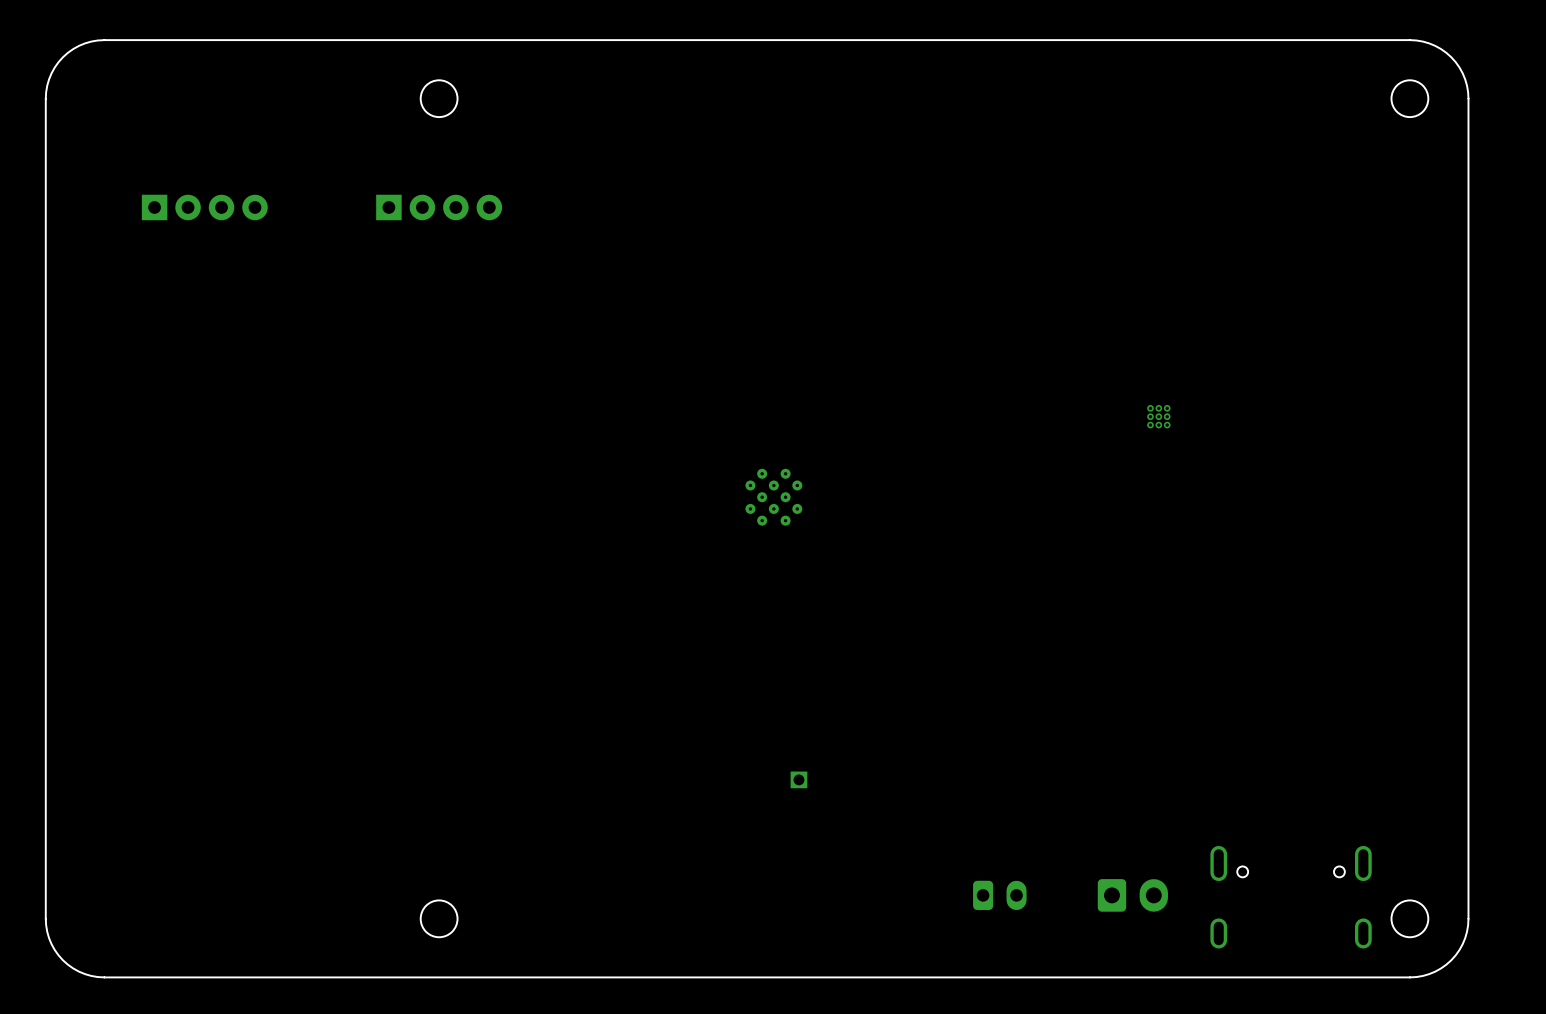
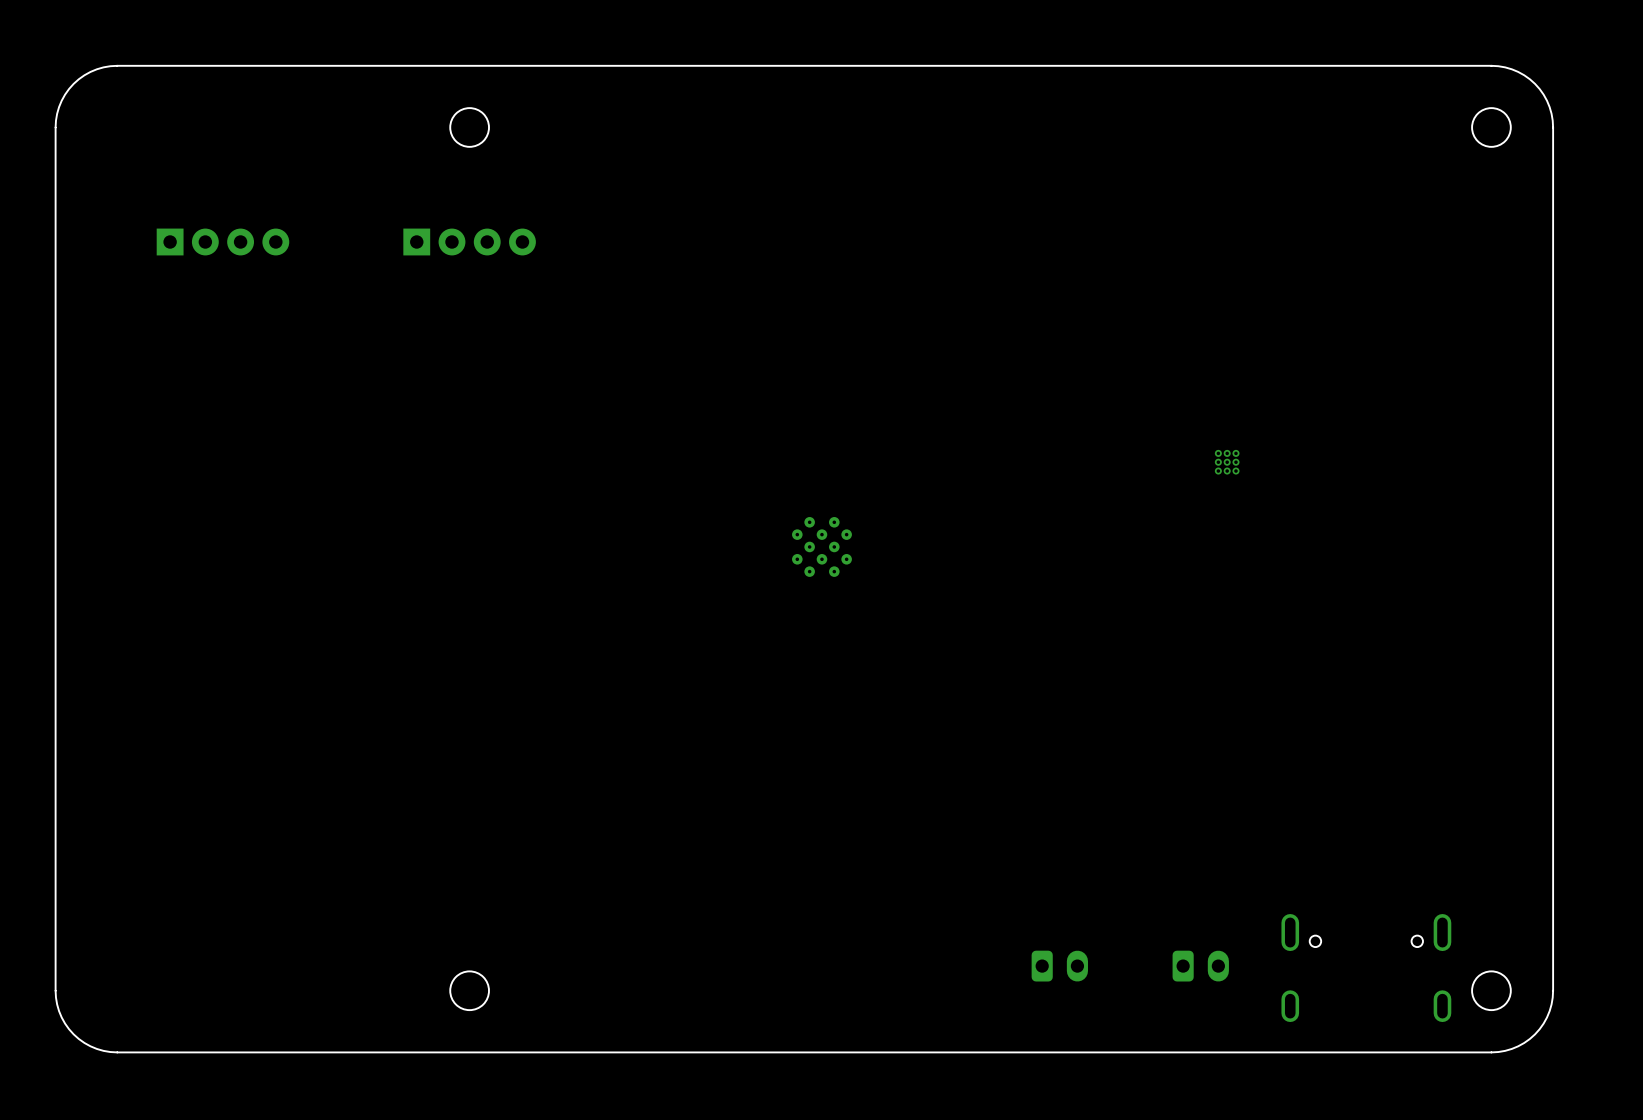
part: (798, 779) -> none
part footprint: [1097, 879, 1169, 912] -> [1172, 950, 1229, 982]

